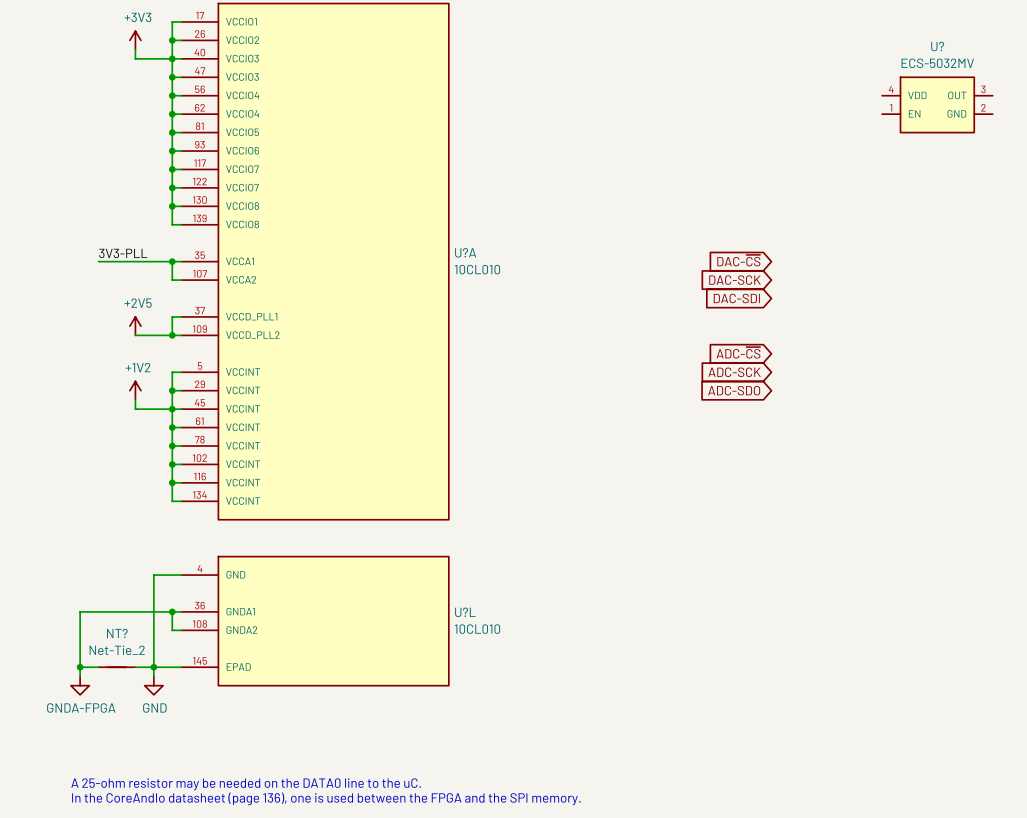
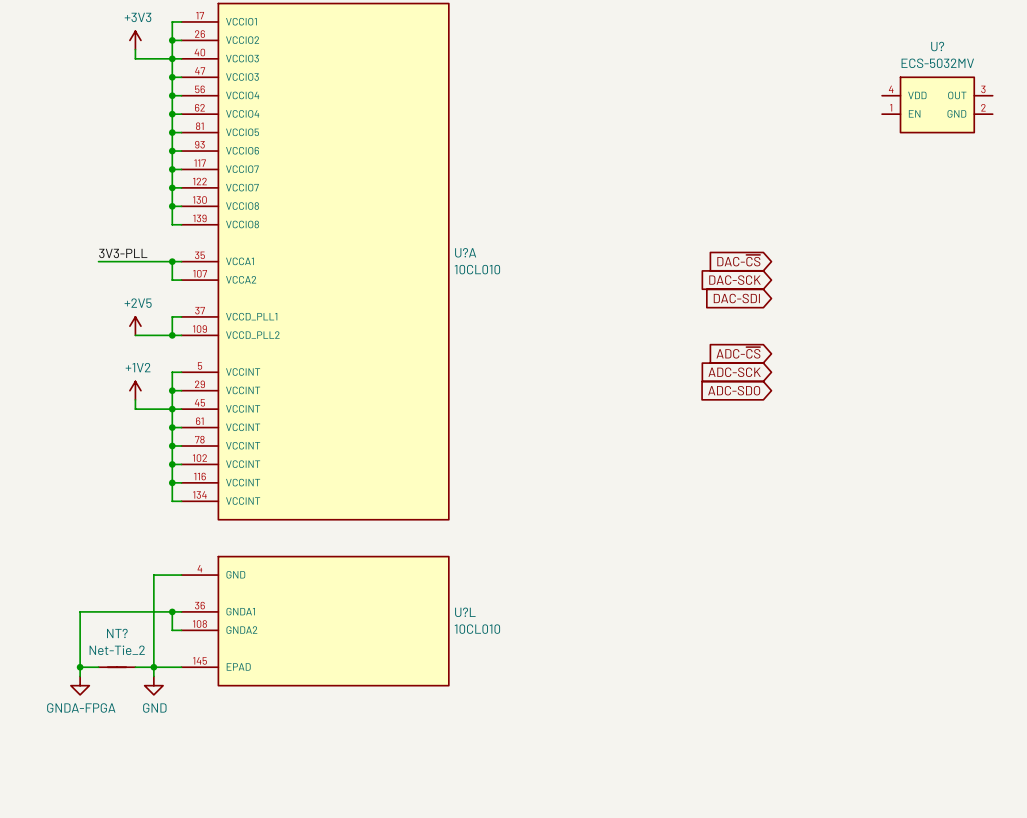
text: A 25-ohm resistor may be needed on the DATA0 line to the uC. (246, 784) -> none
text: In the CoreAndIo datasheet (page 136), one is used between the FPGA and the SPI memory. (326, 798) -> none

